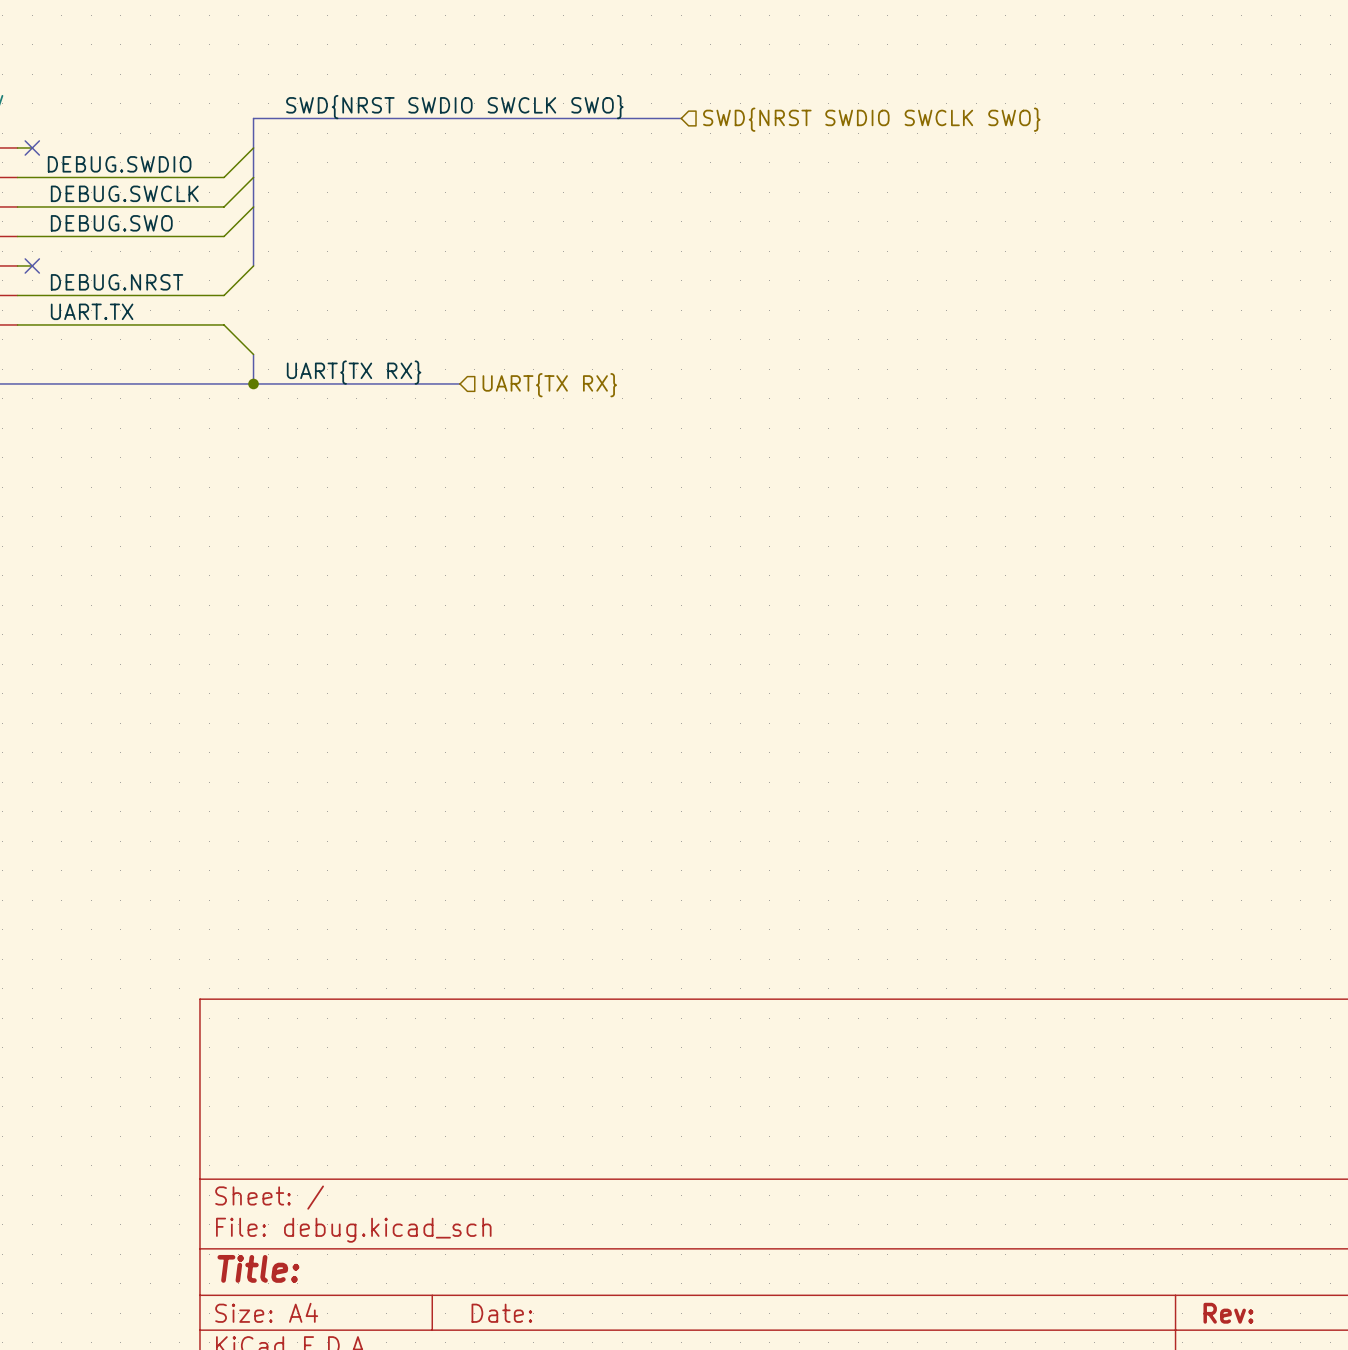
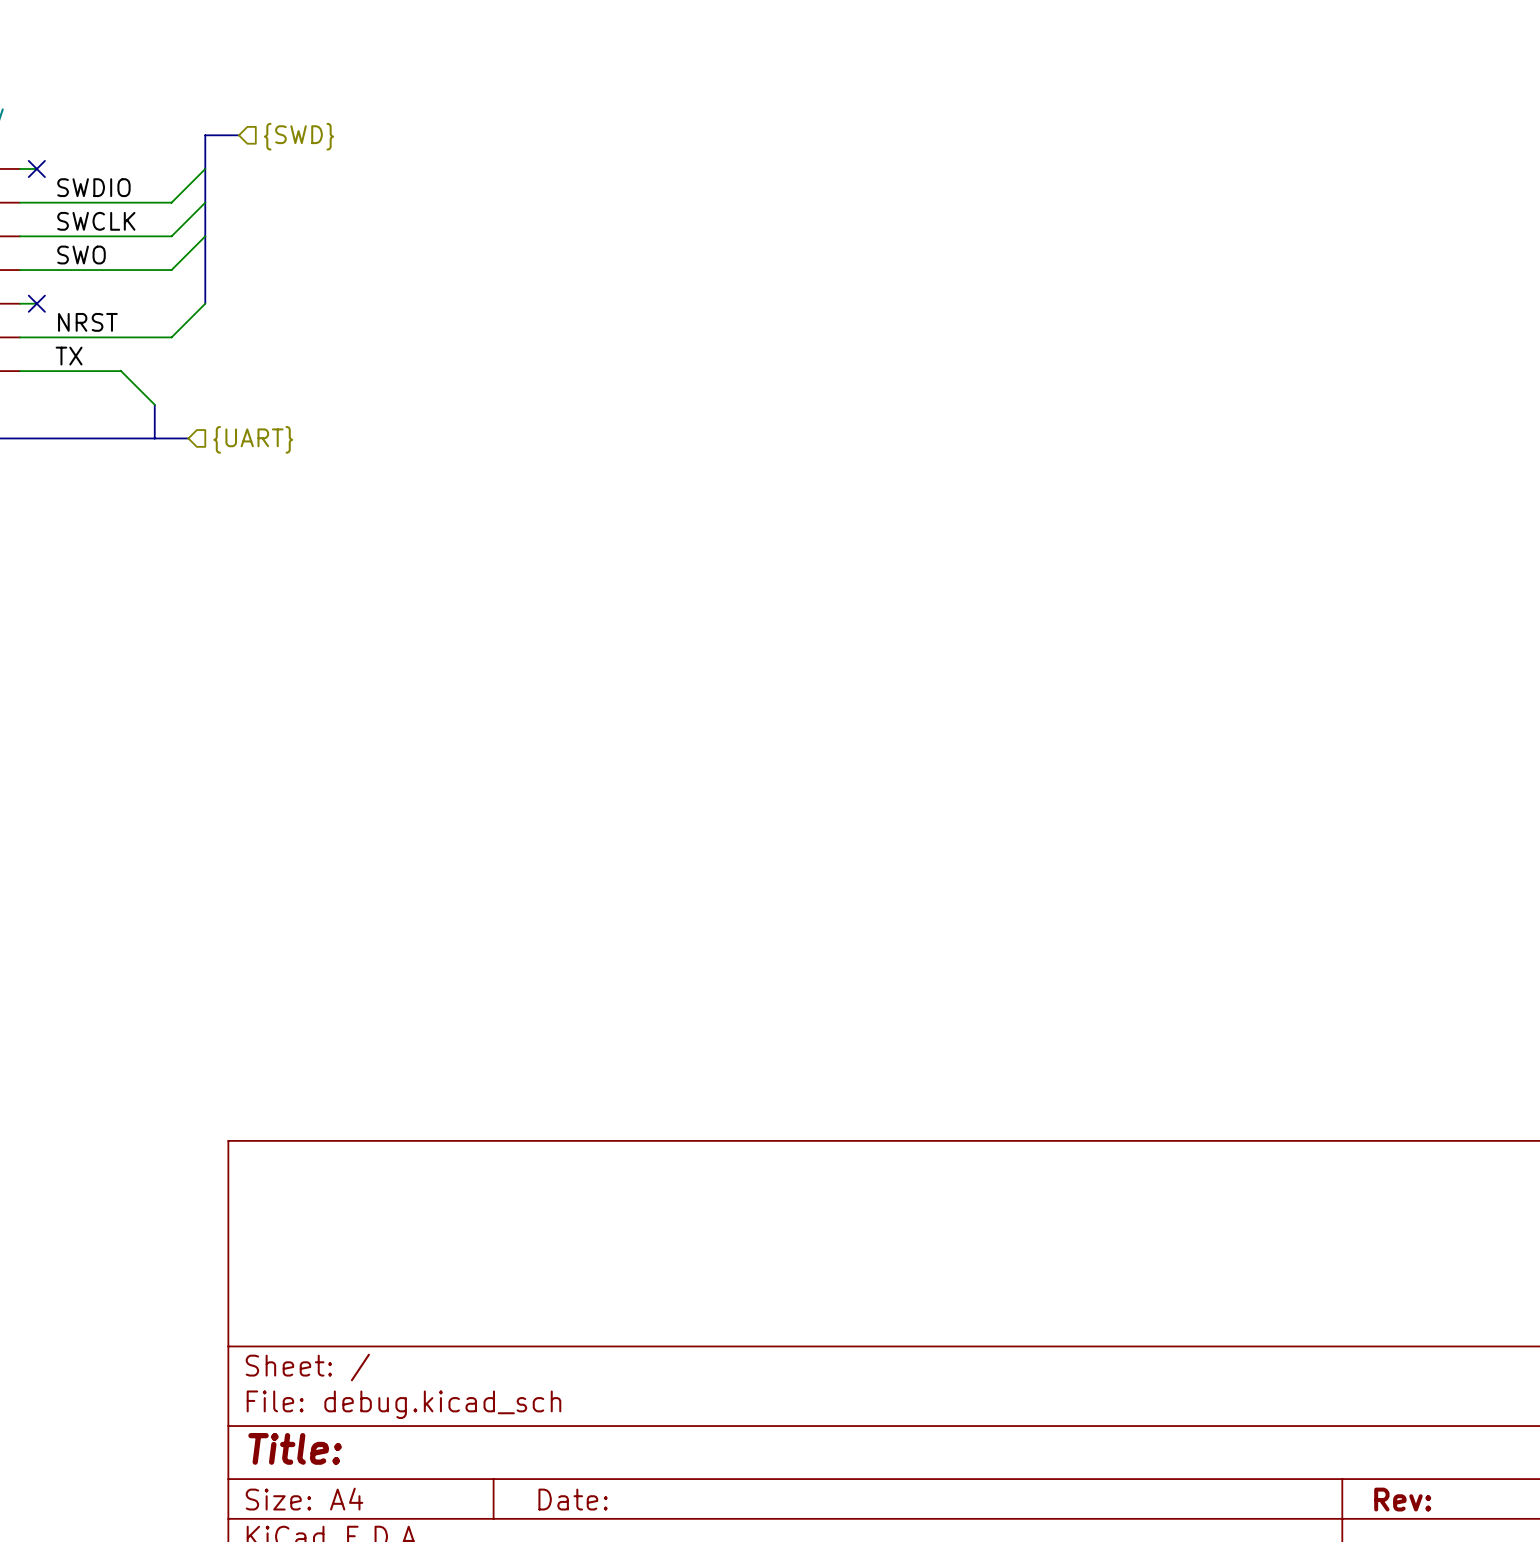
label: SWD{NRST SWDIO SWCLK SWO} (454, 107) -> none
bus: none -> (238, 135) (205, 135) (205, 303)
bus: (681, 118) (253, 118) (253, 265) -> none
hierarchical label: none -> {SWD} (298, 136)
hierarchical label: SWD{NRST SWDIO SWCLK SWO} (871, 119) -> none
wire: (253, 147) (224, 177) (150, 177) -> (205, 168) (171, 202)
label: DEBUG.SWDIO (119, 164) -> SWDIO (93, 187)
wire: (253, 177) (224, 206) (150, 206) -> (205, 202) (171, 236)
label: DEBUG.SWCLK (124, 193) -> SWCLK (96, 221)
wire: (253, 206) (224, 236) (150, 236) -> (205, 236) (171, 270)
label: DEBUG.SWO (111, 223) -> SWO (81, 255)
wire: (253, 265) (224, 295) (150, 295) -> (205, 303) (171, 337)
label: DEBUG.NRST (117, 282) -> NRST (87, 322)
label: UART.TX (92, 311) -> TX (69, 356)
wire: (106, 324) (224, 324) (253, 354) -> (121, 371) (154, 404)
bus: (253, 354) (253, 383) -> (154, 404) (154, 438)
label: UART{TX RX} (354, 372) -> none
bus: (165, 383) (460, 383) -> none
junction: (253, 383) -> none
hierarchical label: none -> {UART} (253, 439)
hierarchical label: UART{TX RX} (549, 385) -> none

